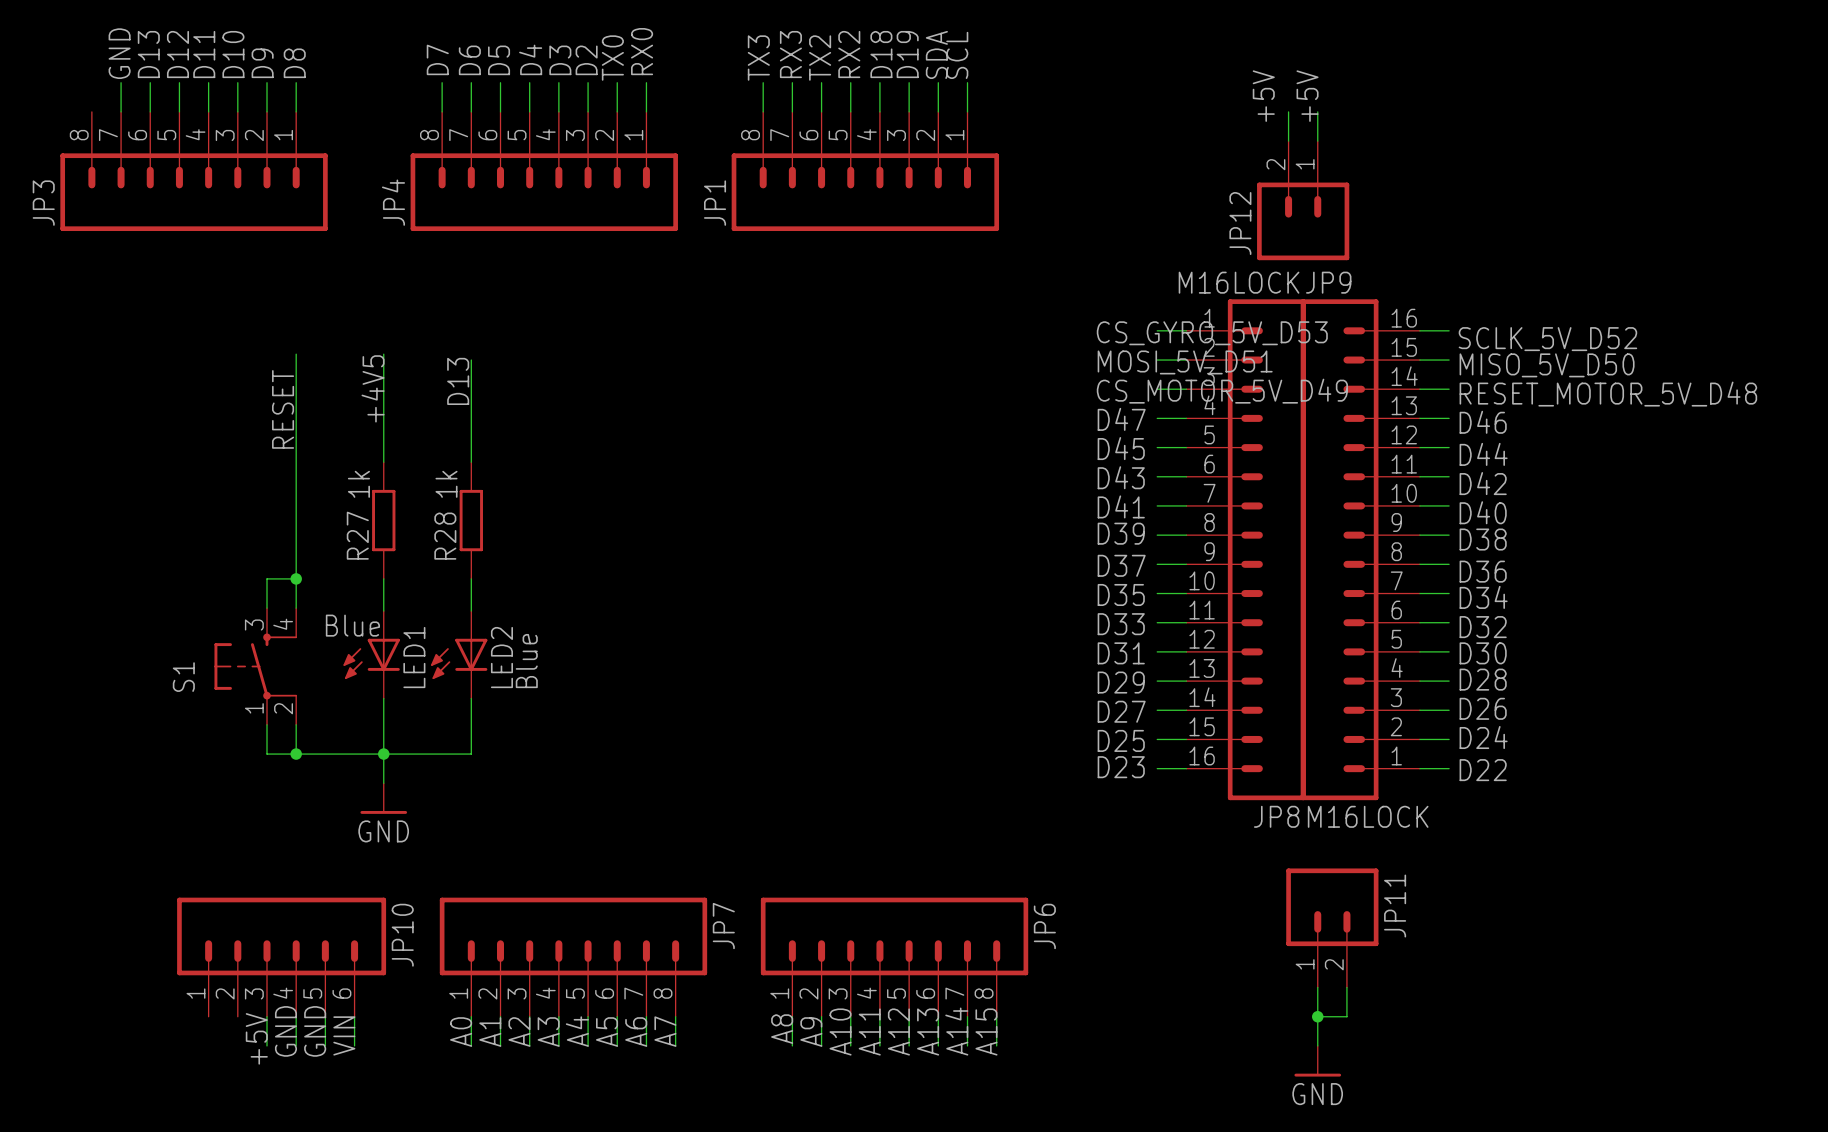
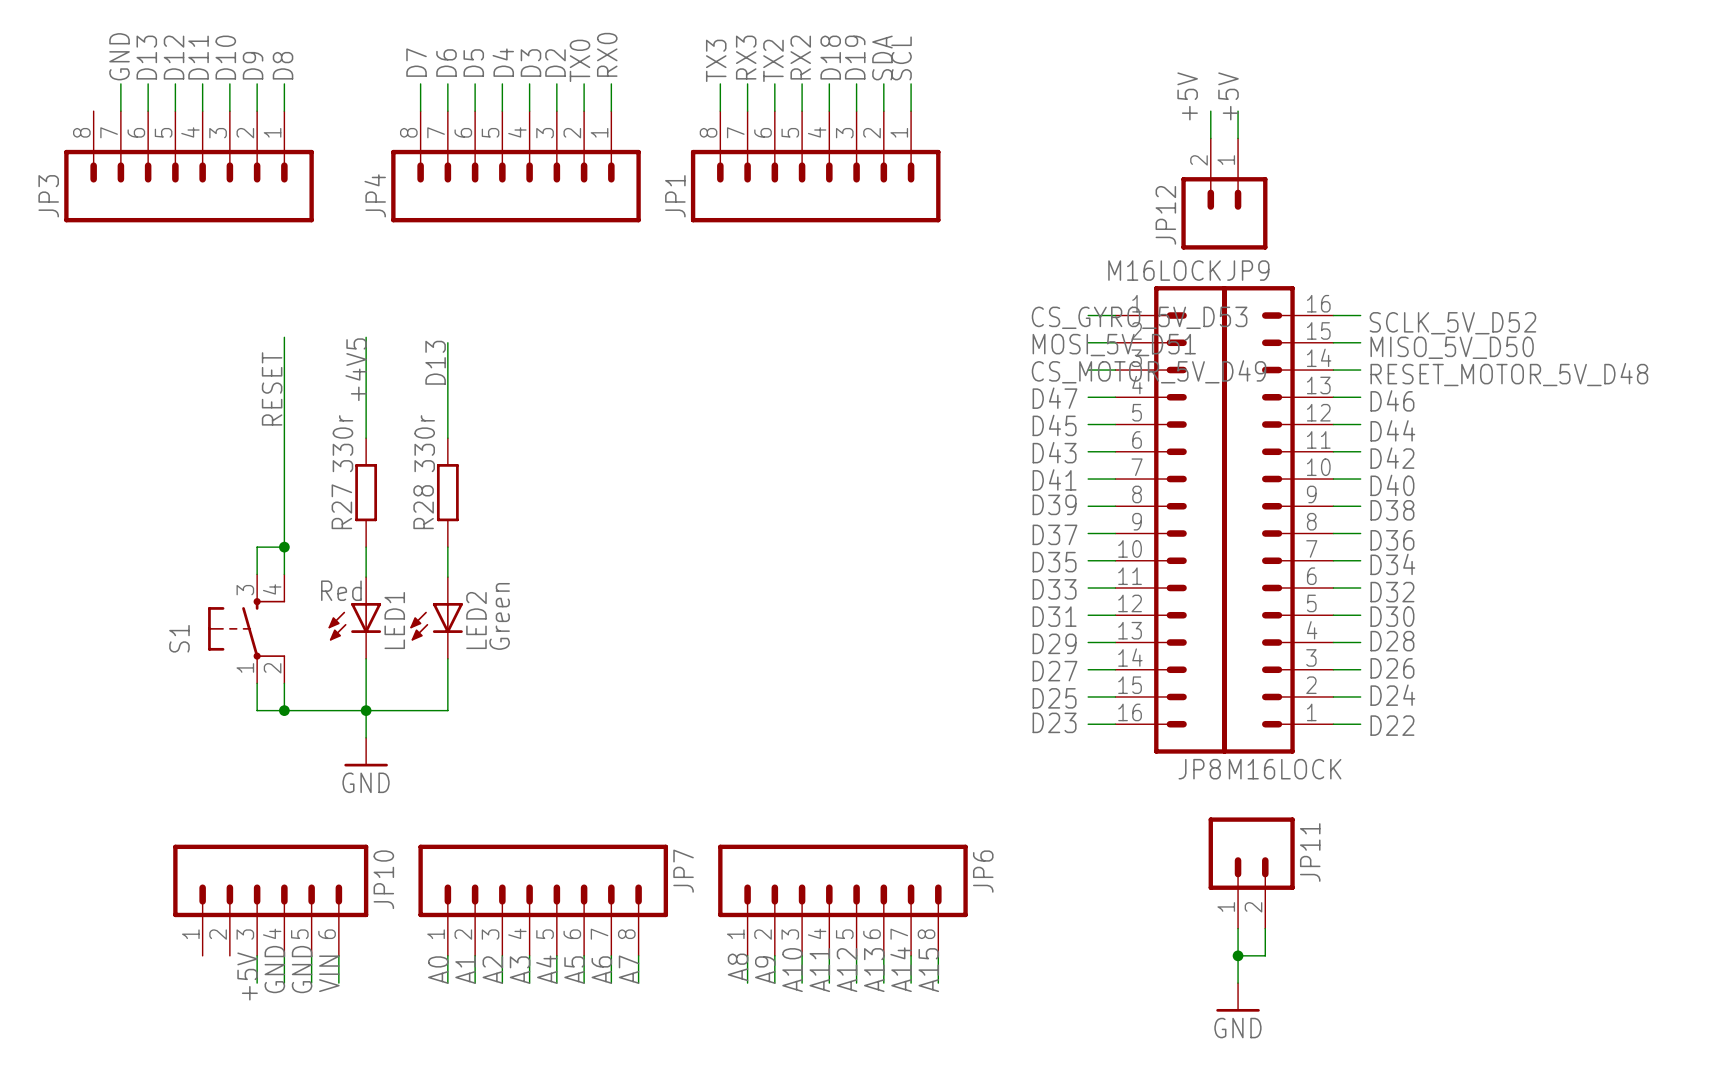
R27 value: 1k (358, 484) -> 330r (342, 443)
R28 value: 1k (446, 484) -> 330r (424, 443)
LED1 value: Blue (352, 625) -> Red (341, 590)
LED2 value: Blue (526, 661) -> Green (499, 616)

